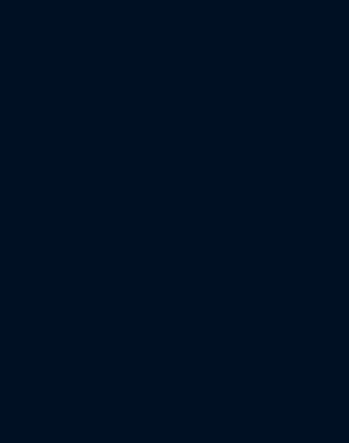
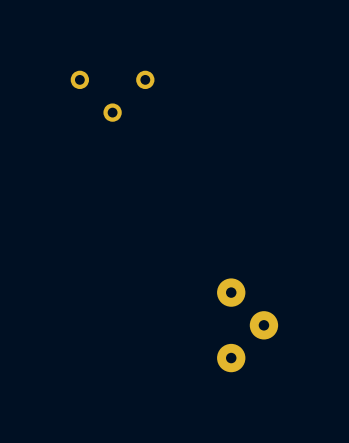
part: none -> (112, 96)
part: none -> (247, 325)

